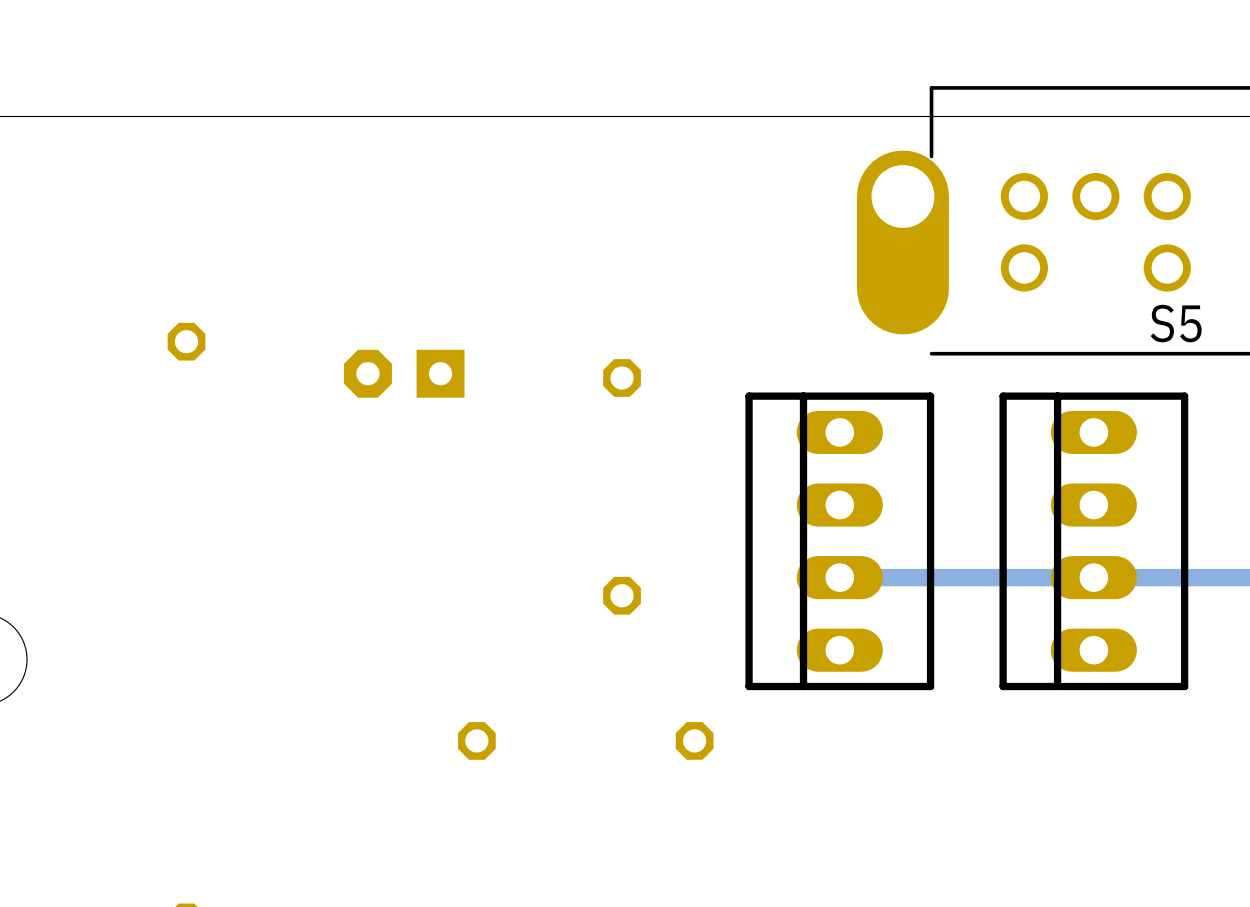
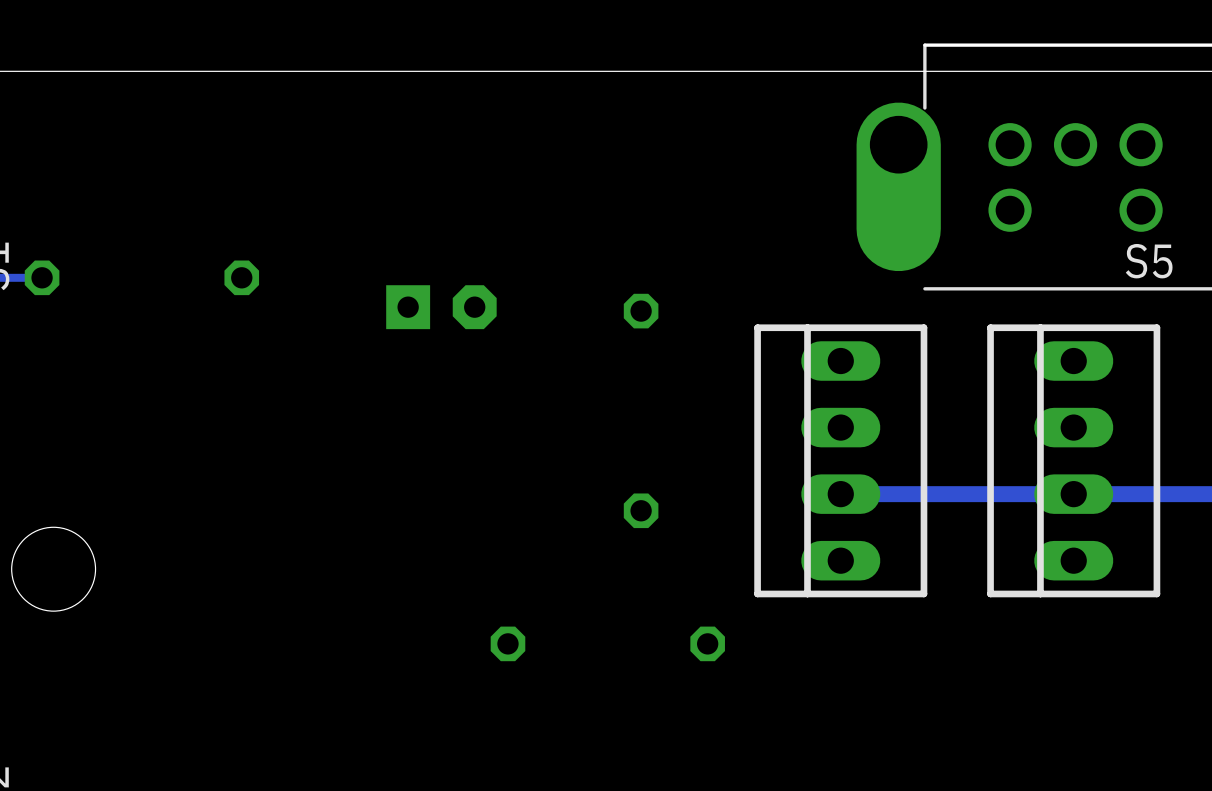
part rotation: 0° (404, 373) -> 180° (441, 307)

